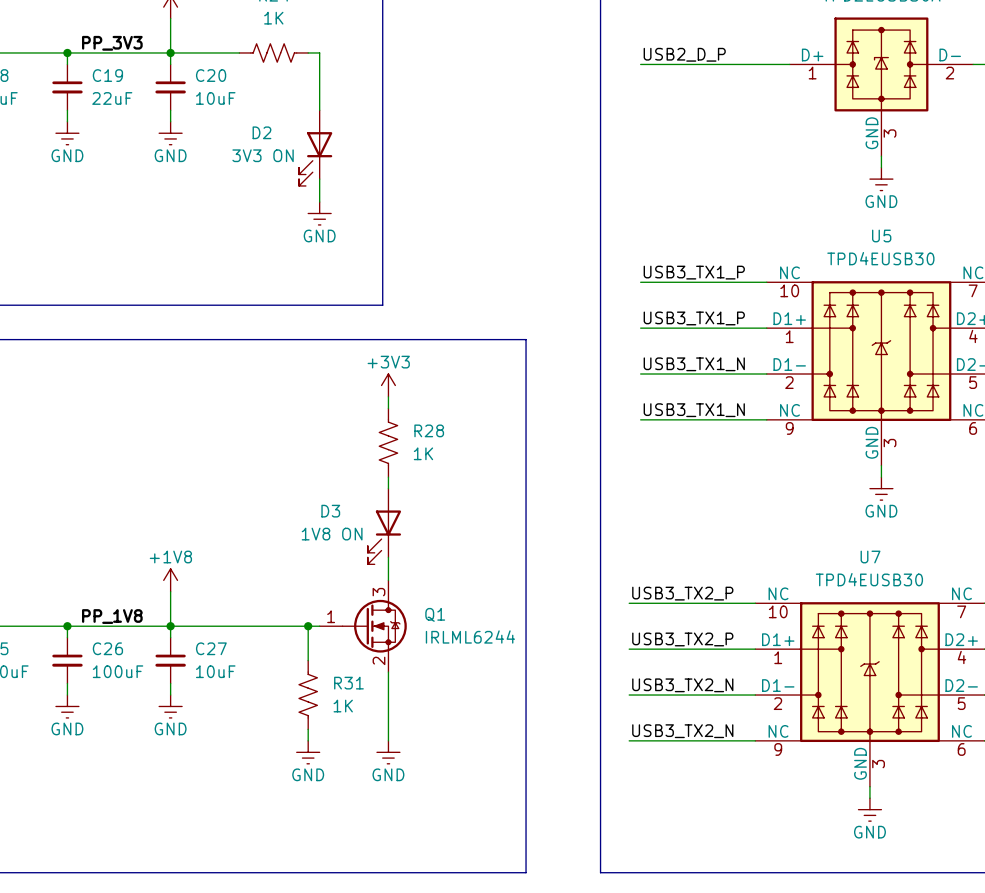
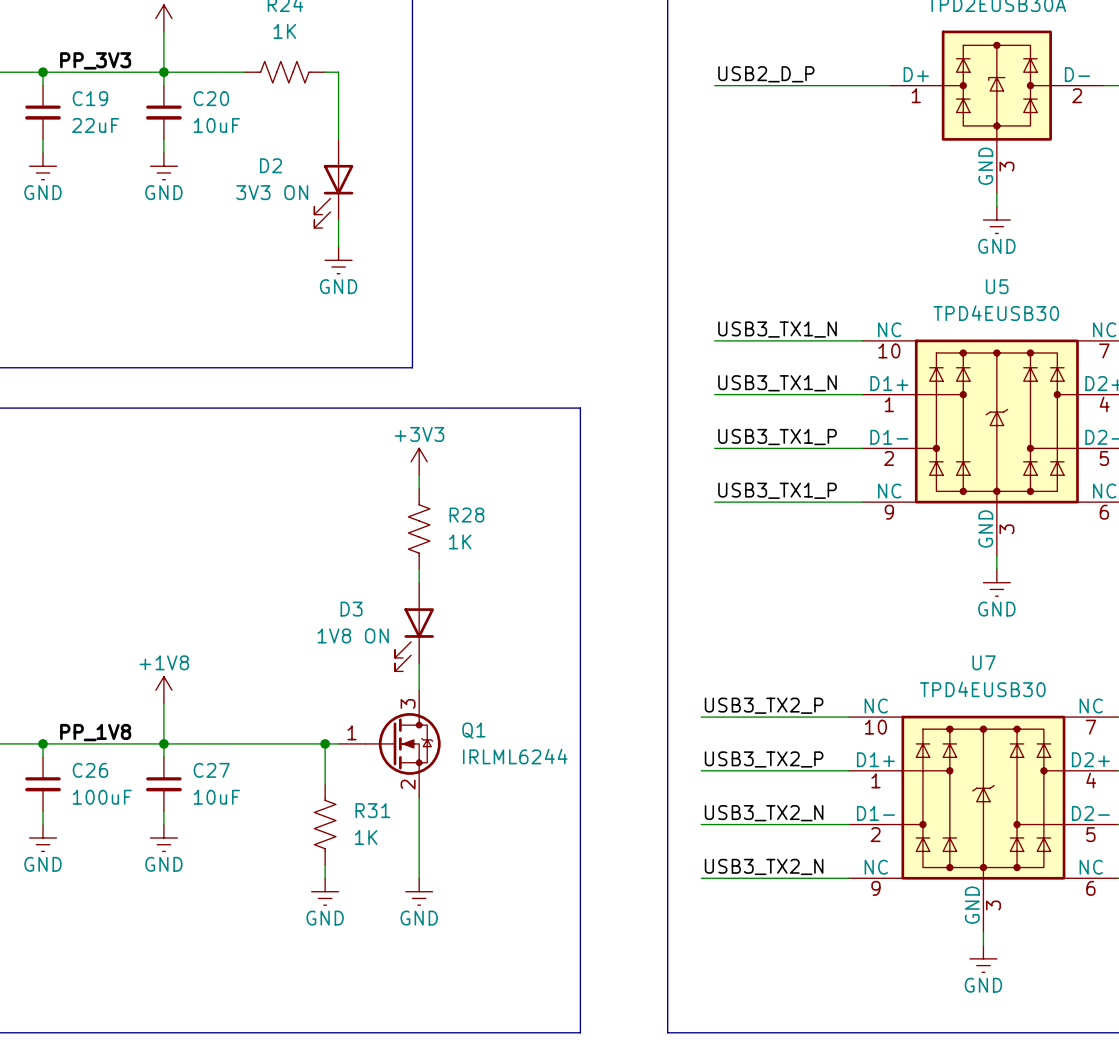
label: USB3_TX1_P (694, 272) -> USB3_TX1_N (777, 329)
label: USB3_TX1_P (694, 318) -> USB3_TX1_N (777, 383)
label: USB3_TX1_N (694, 364) -> USB3_TX1_P (777, 437)
label: USB3_TX1_N (694, 410) -> USB3_TX1_P (777, 490)

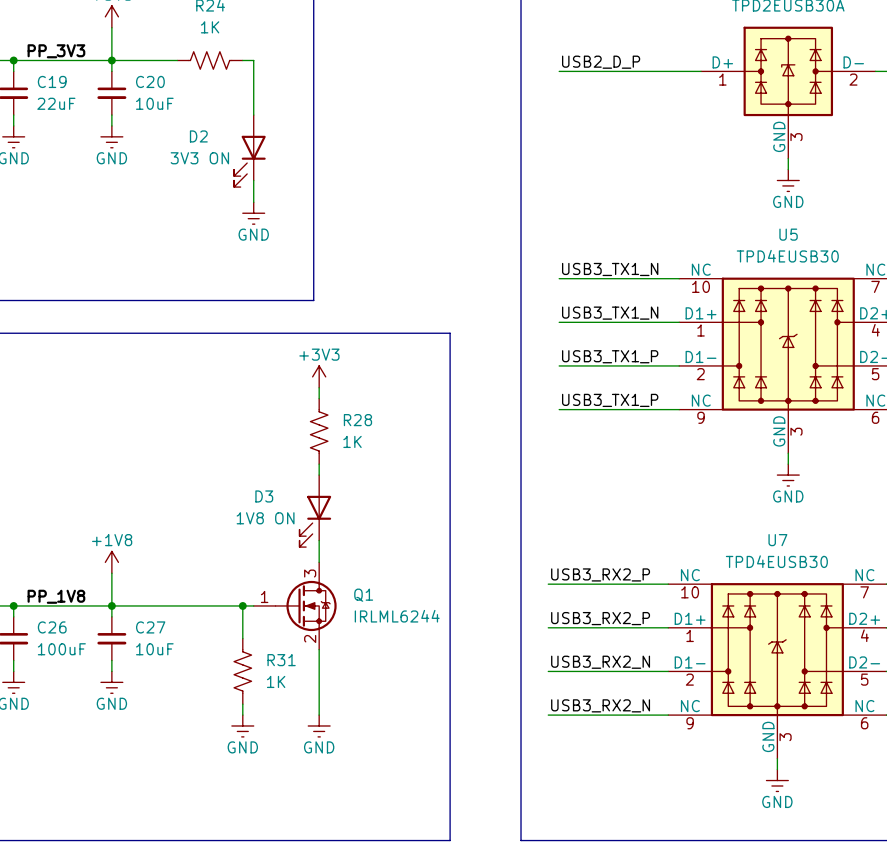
label: USB3_TX2_P (764, 705) -> USB3_RX2_P (600, 574)
label: USB3_TX2_P (764, 759) -> USB3_RX2_P (600, 618)
label: USB3_TX2_N (764, 813) -> USB3_RX2_N (600, 662)
label: USB3_TX2_N (764, 866) -> USB3_RX2_N (600, 705)

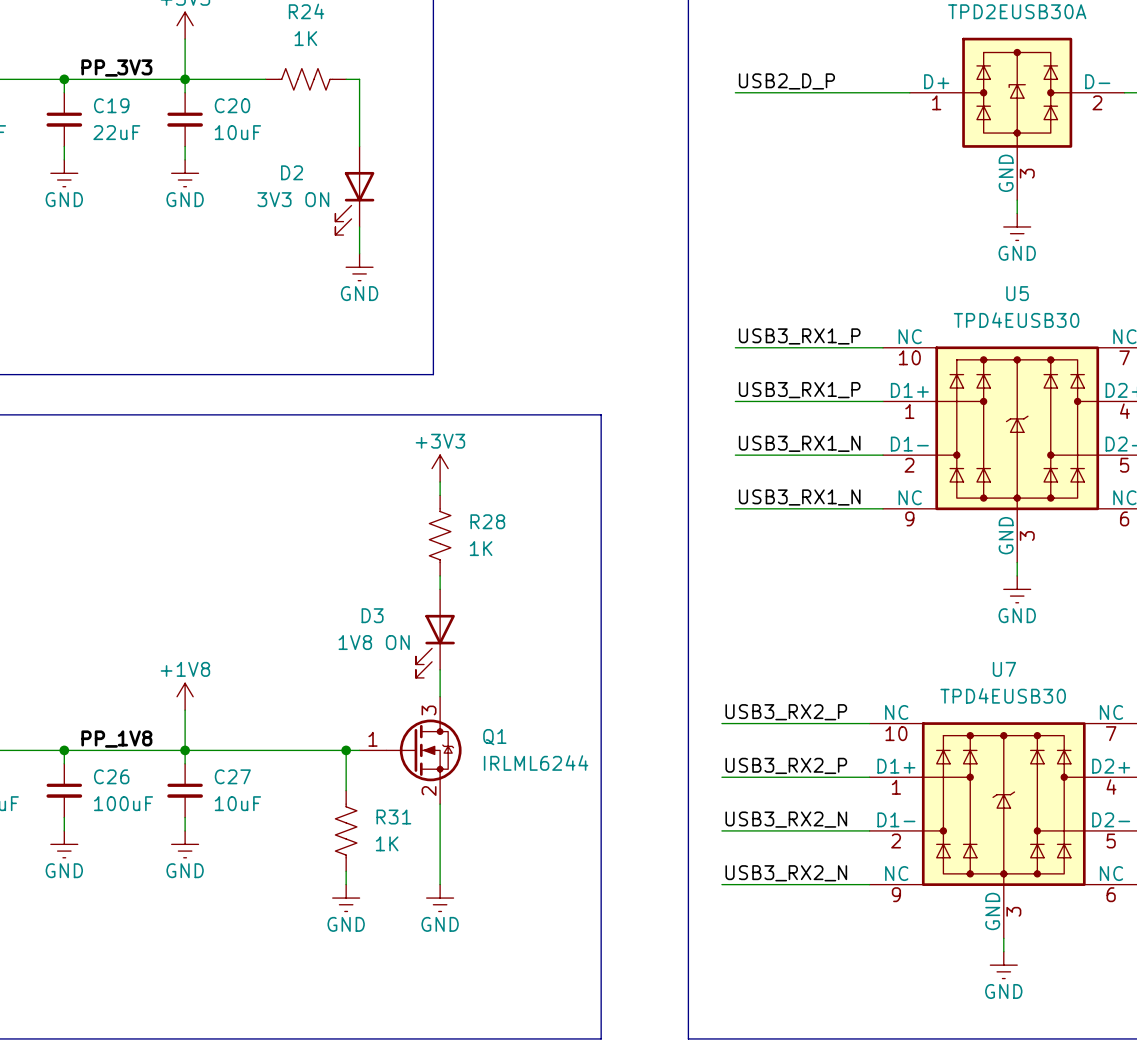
label: USB3_TX1_N (610, 269) -> USB3_RX1_P (799, 336)
label: USB3_TX1_N (610, 313) -> USB3_RX1_P (799, 390)
label: USB3_TX1_P (610, 356) -> USB3_RX1_N (799, 443)
label: USB3_TX1_P (610, 400) -> USB3_RX1_N (799, 497)

